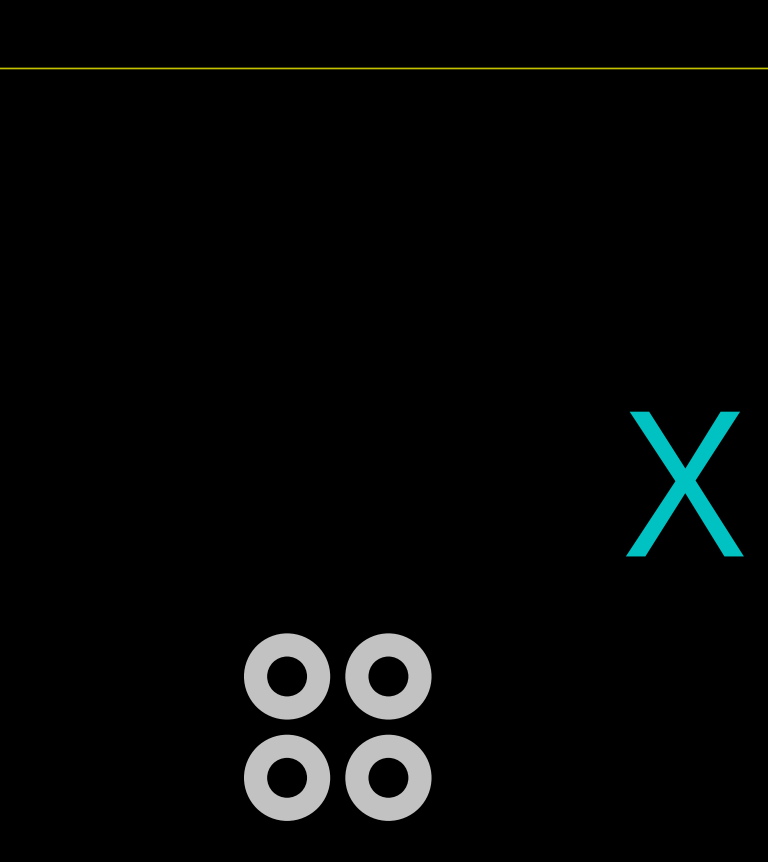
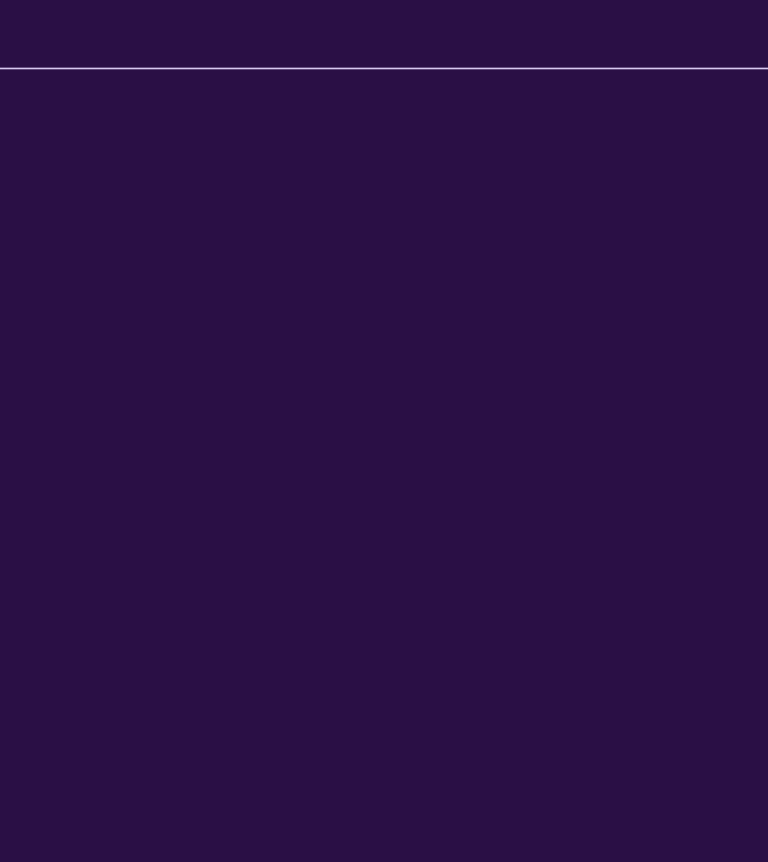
text: X (684, 484) -> none
via: (287, 676) -> none
via: (388, 676) -> none
via: (287, 777) -> none
via: (388, 777) -> none

